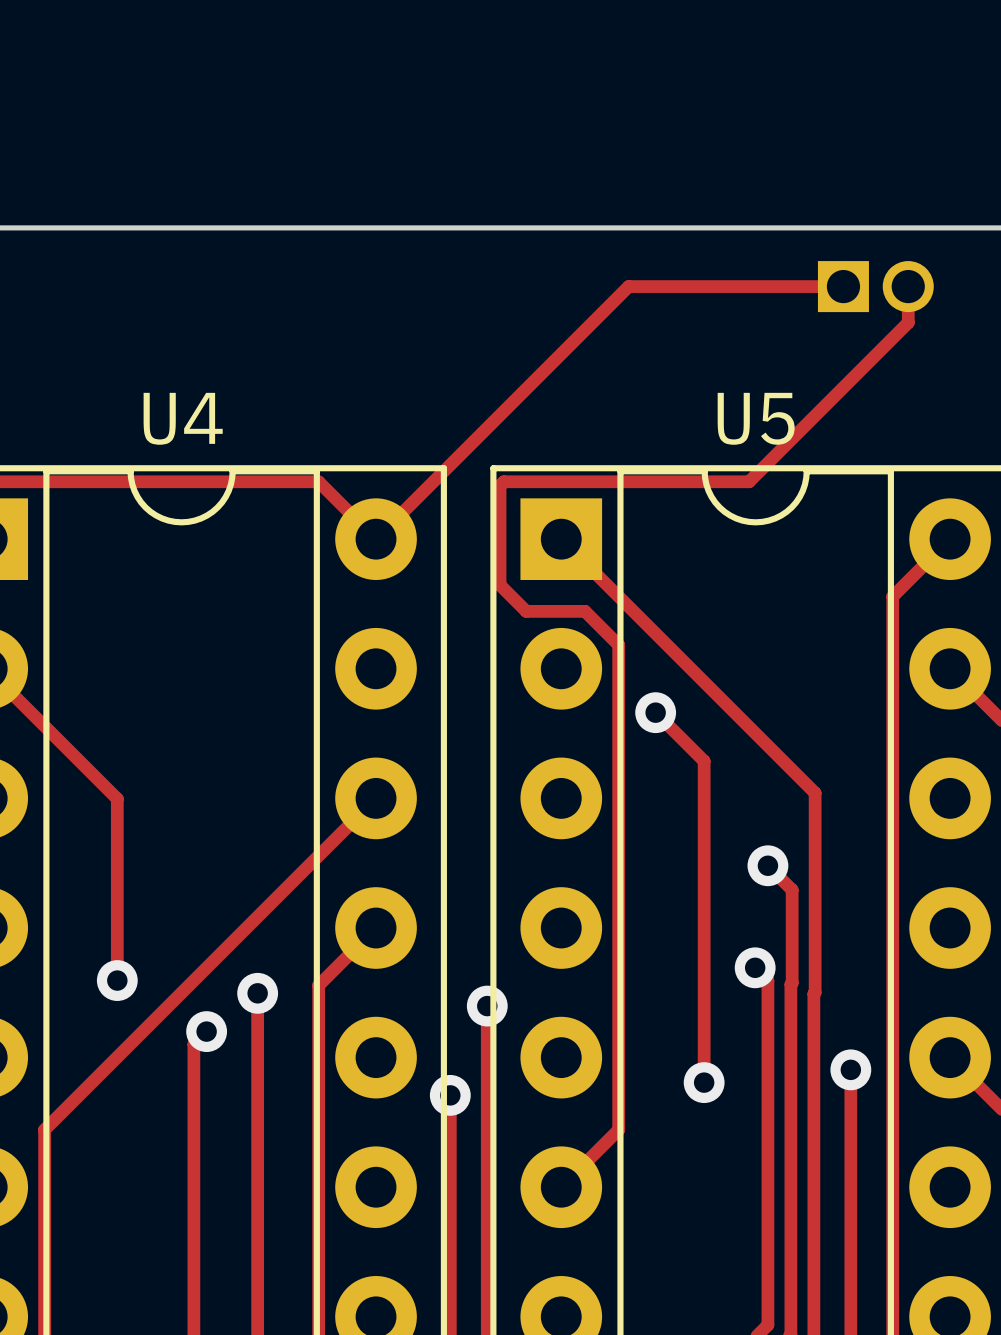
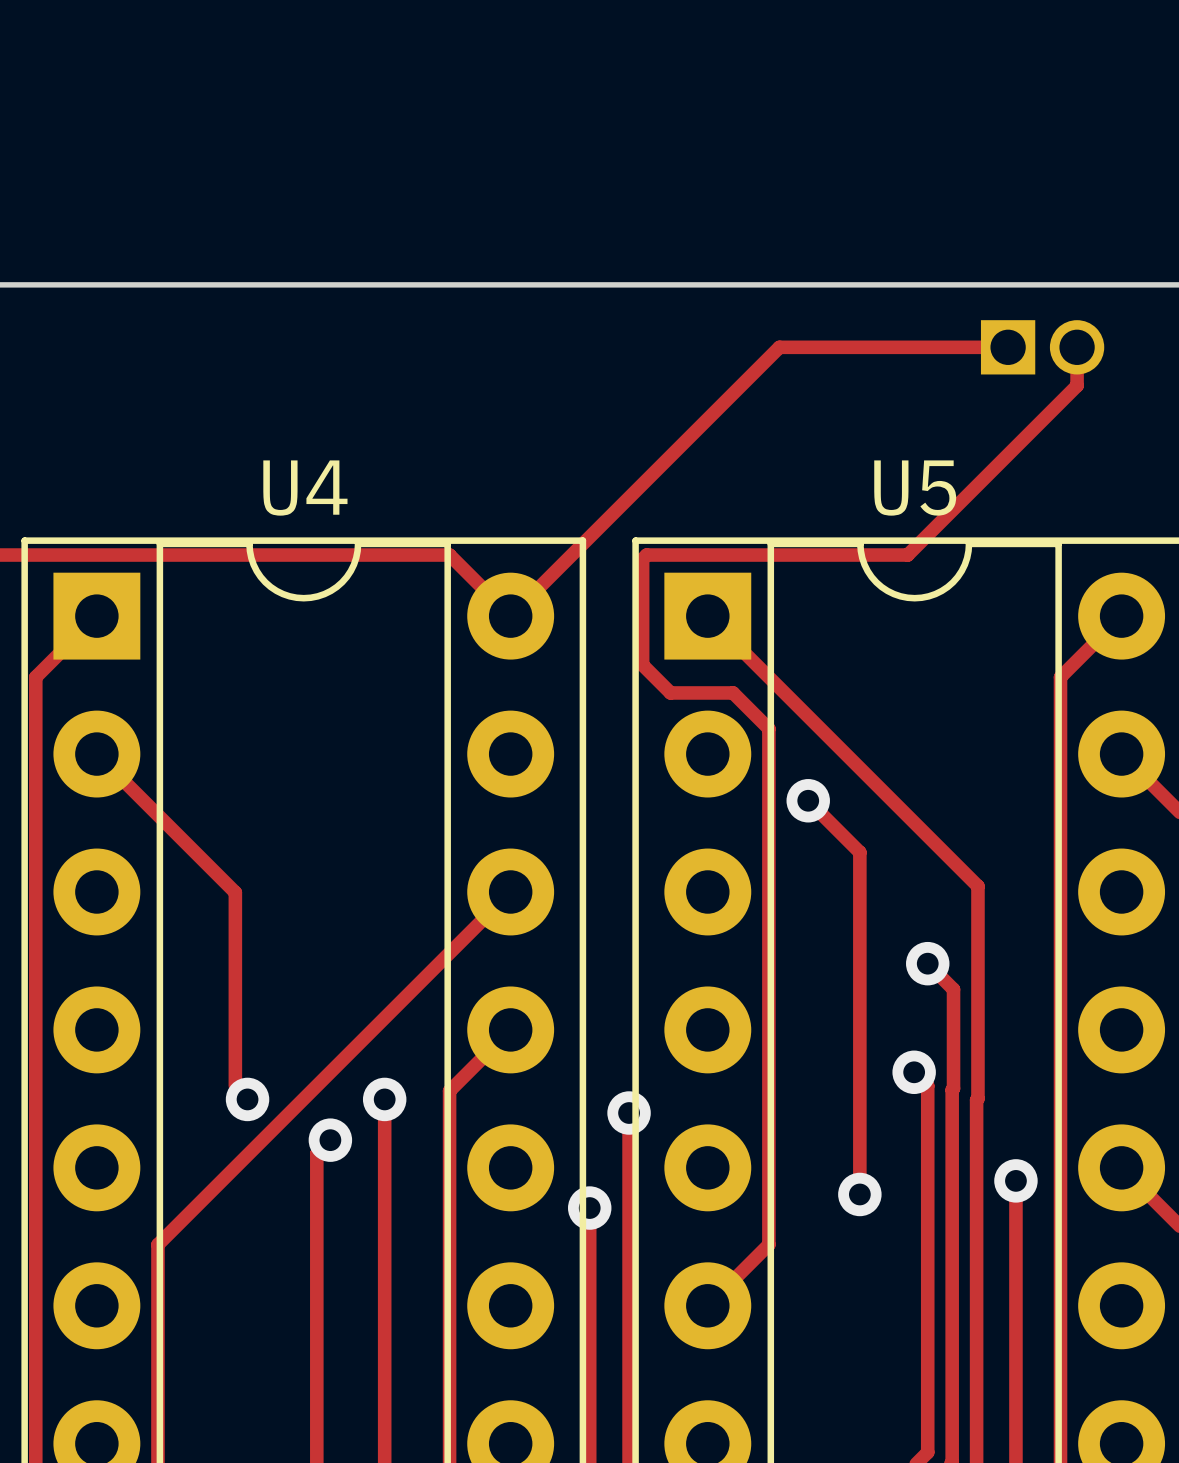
via position: (117, 980) -> (247, 1099)

